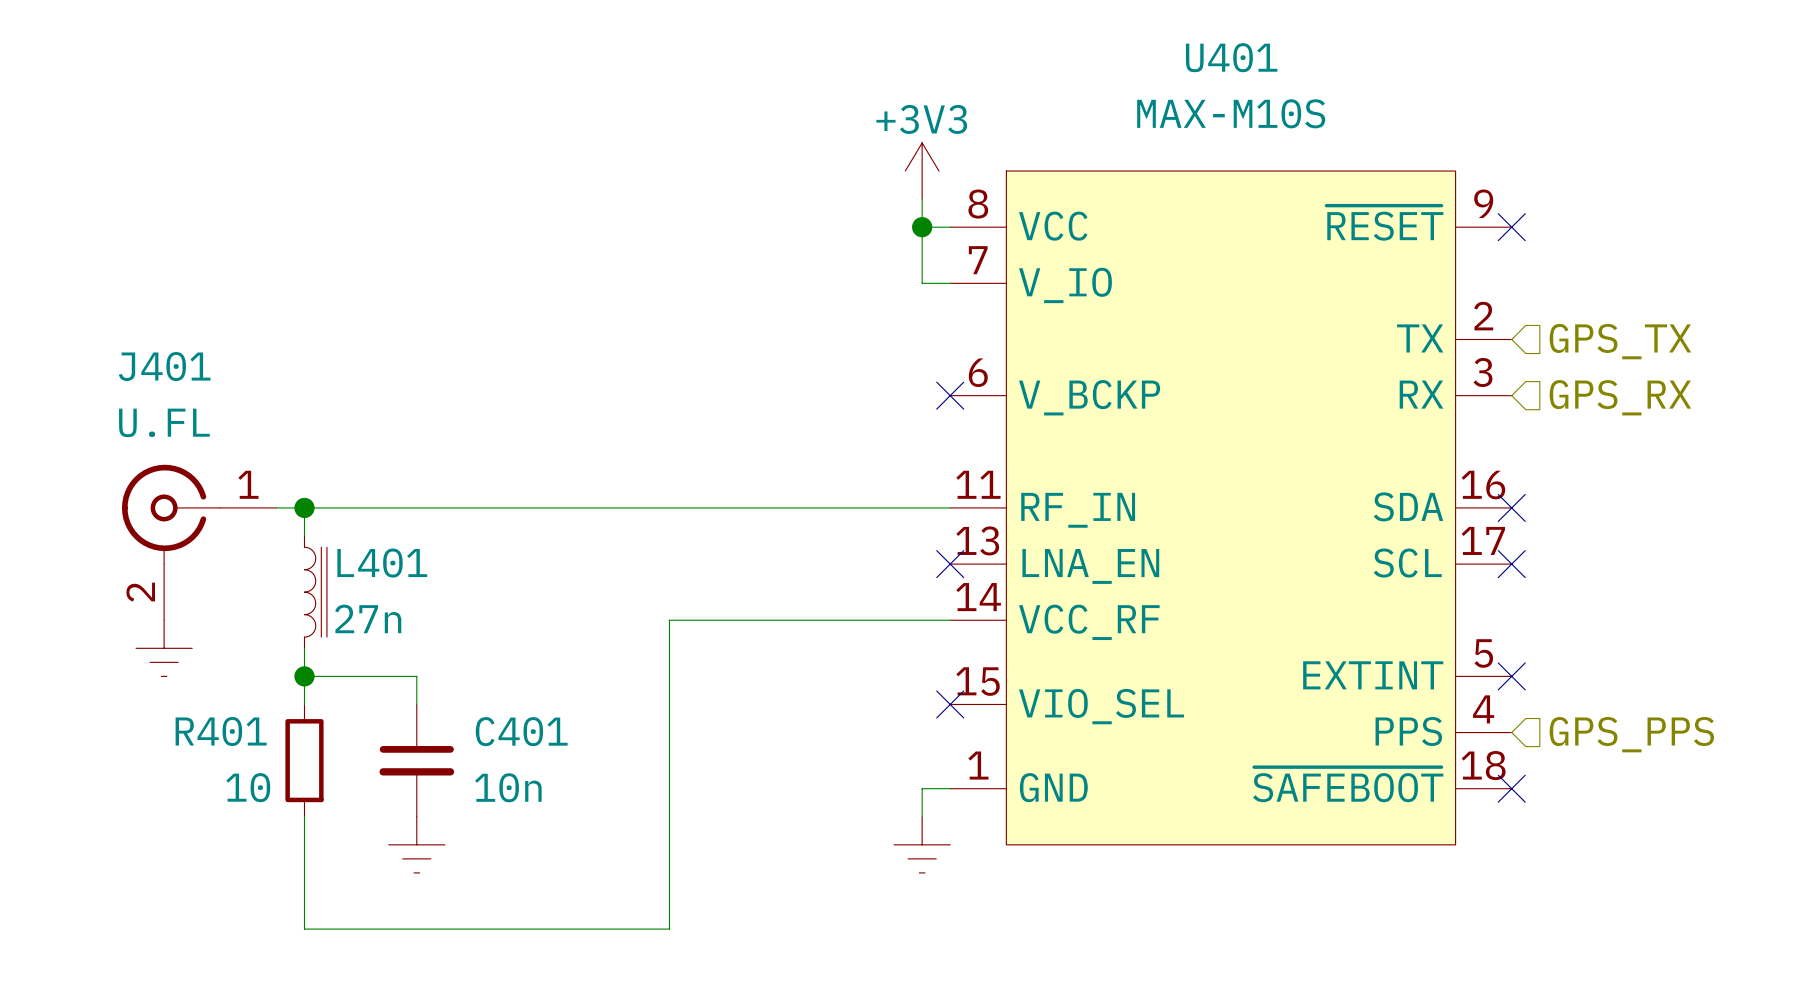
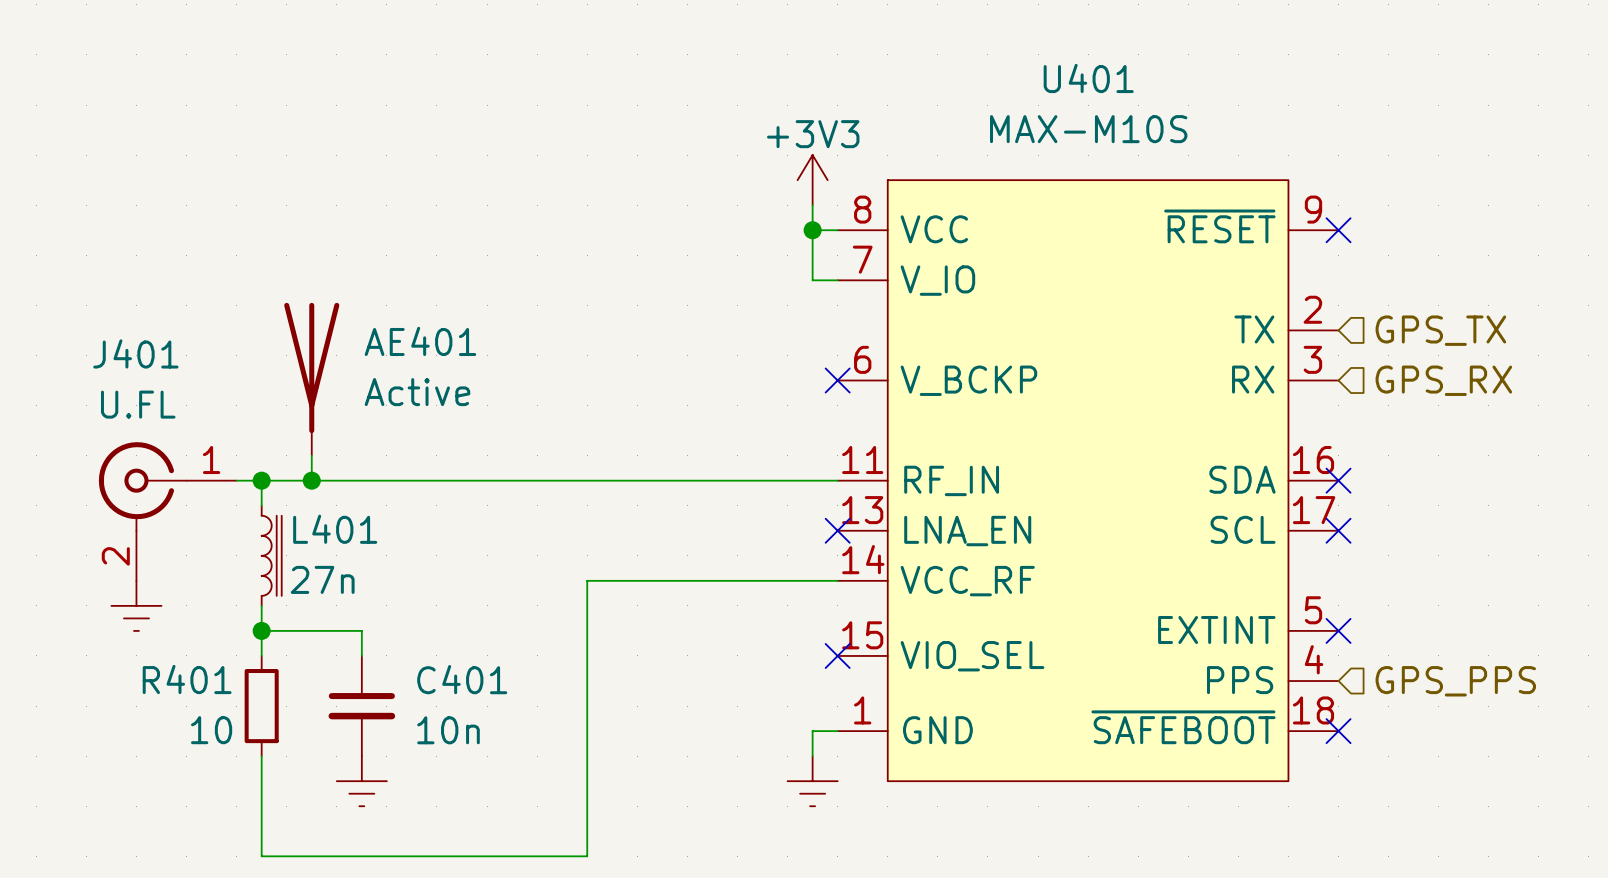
AE401: none -> Active (311, 379)
wire: none -> (311, 455) (311, 480)
junction: none -> (311, 480)

